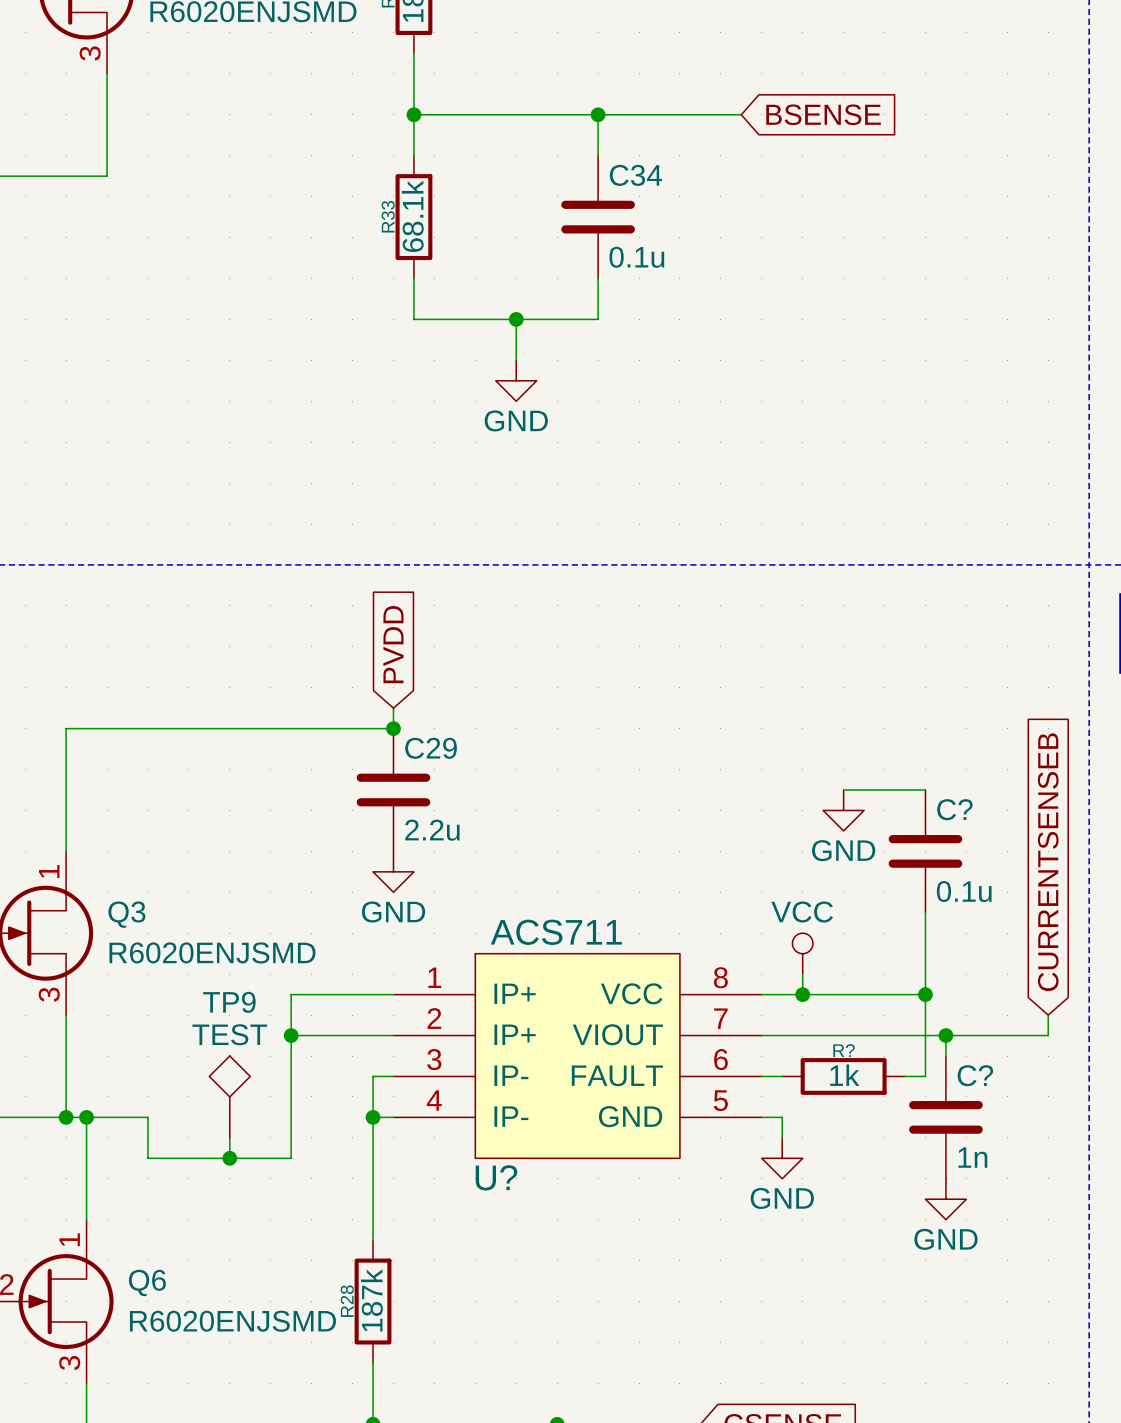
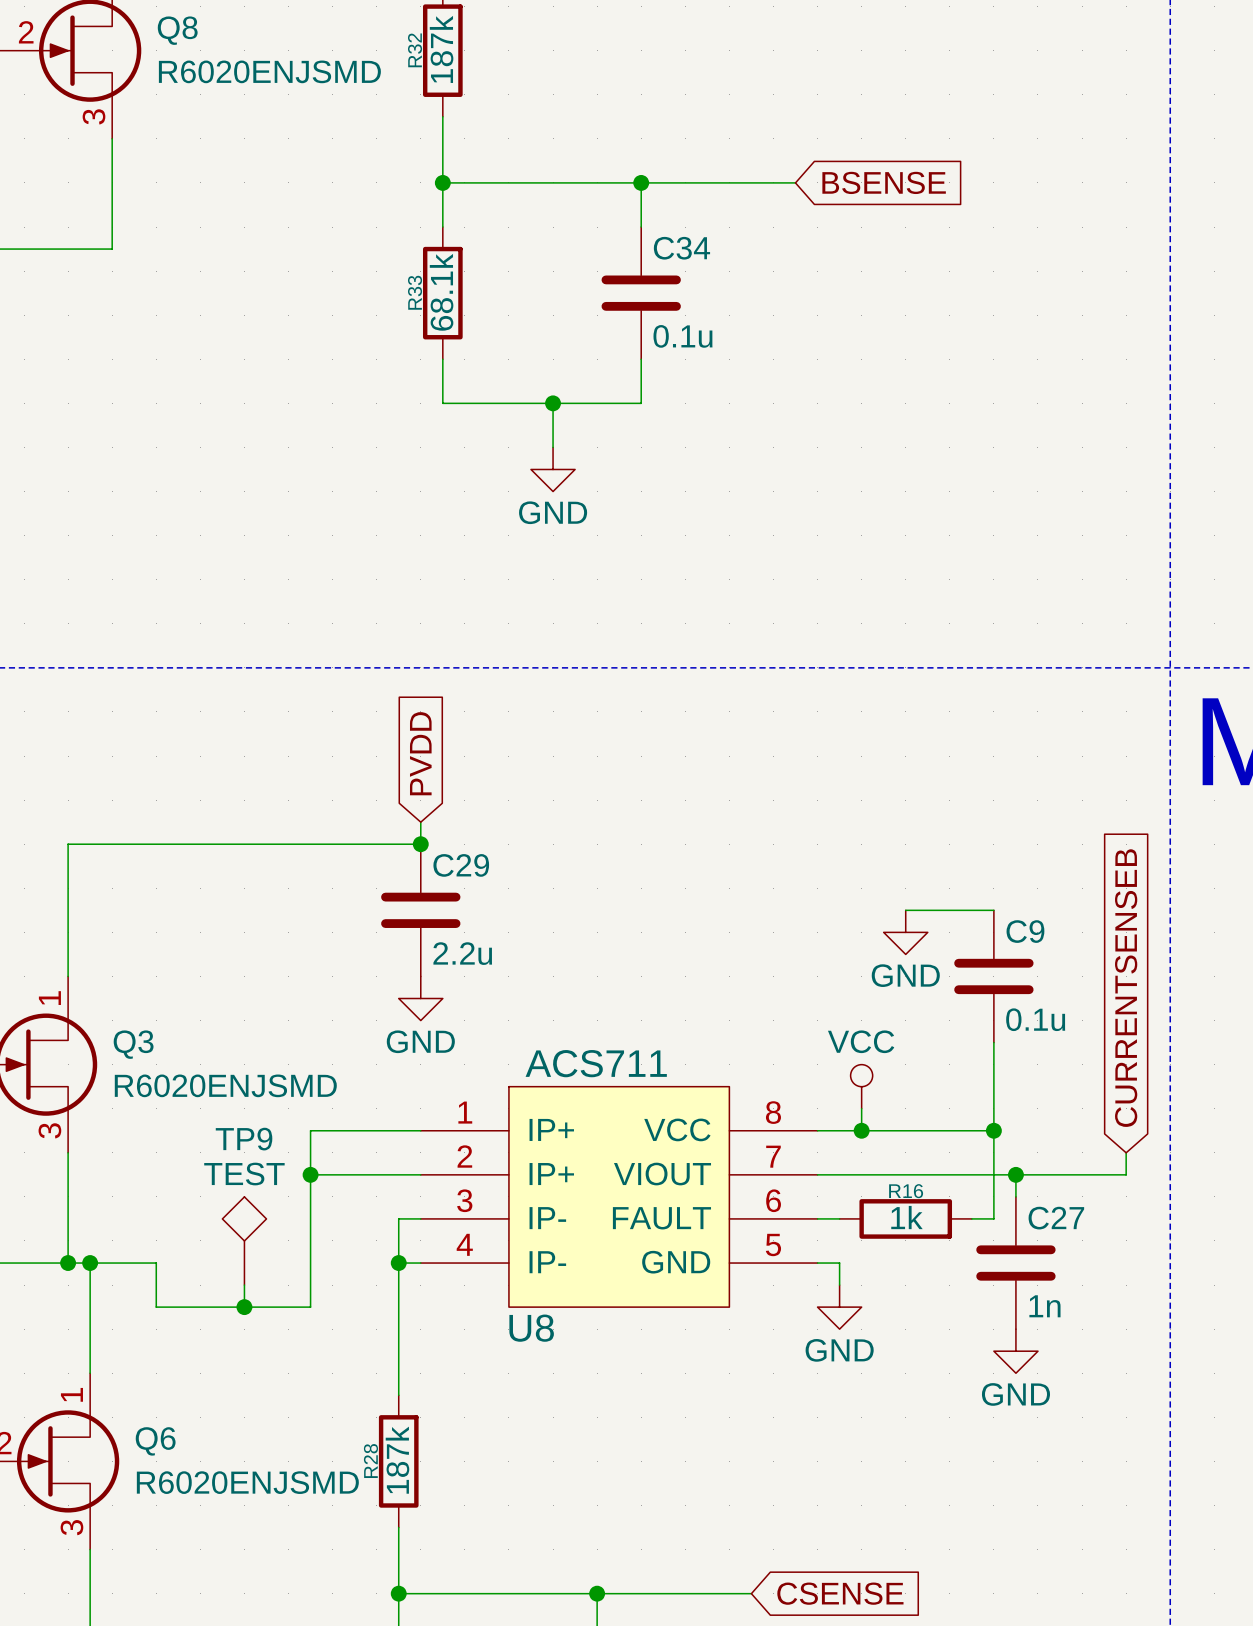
C? name: C? (954, 809) -> C9 (1025, 931)
R? name: R? (844, 1050) -> R16 (906, 1191)
C? name: C? (975, 1075) -> C27 (1056, 1218)
U? name: U? (496, 1177) -> U8 (531, 1328)

